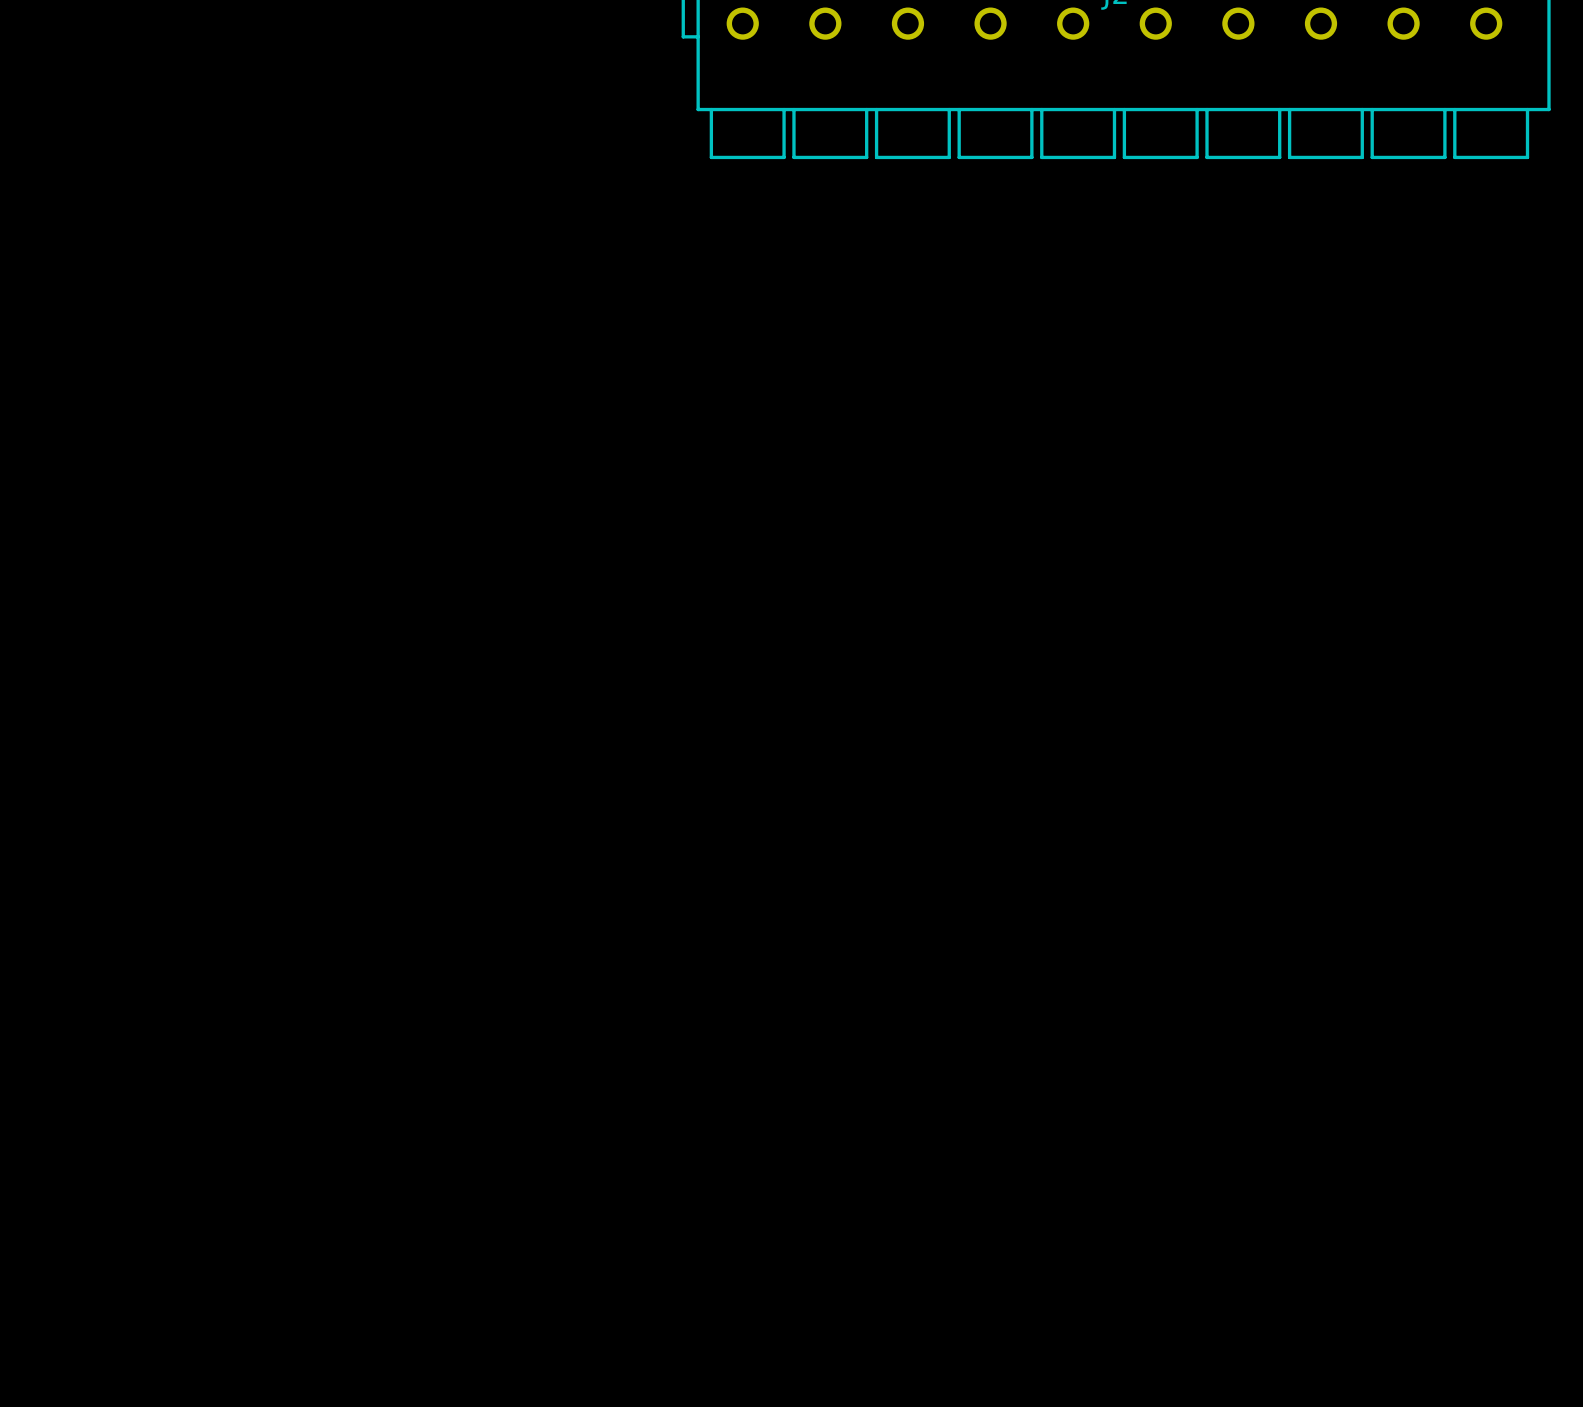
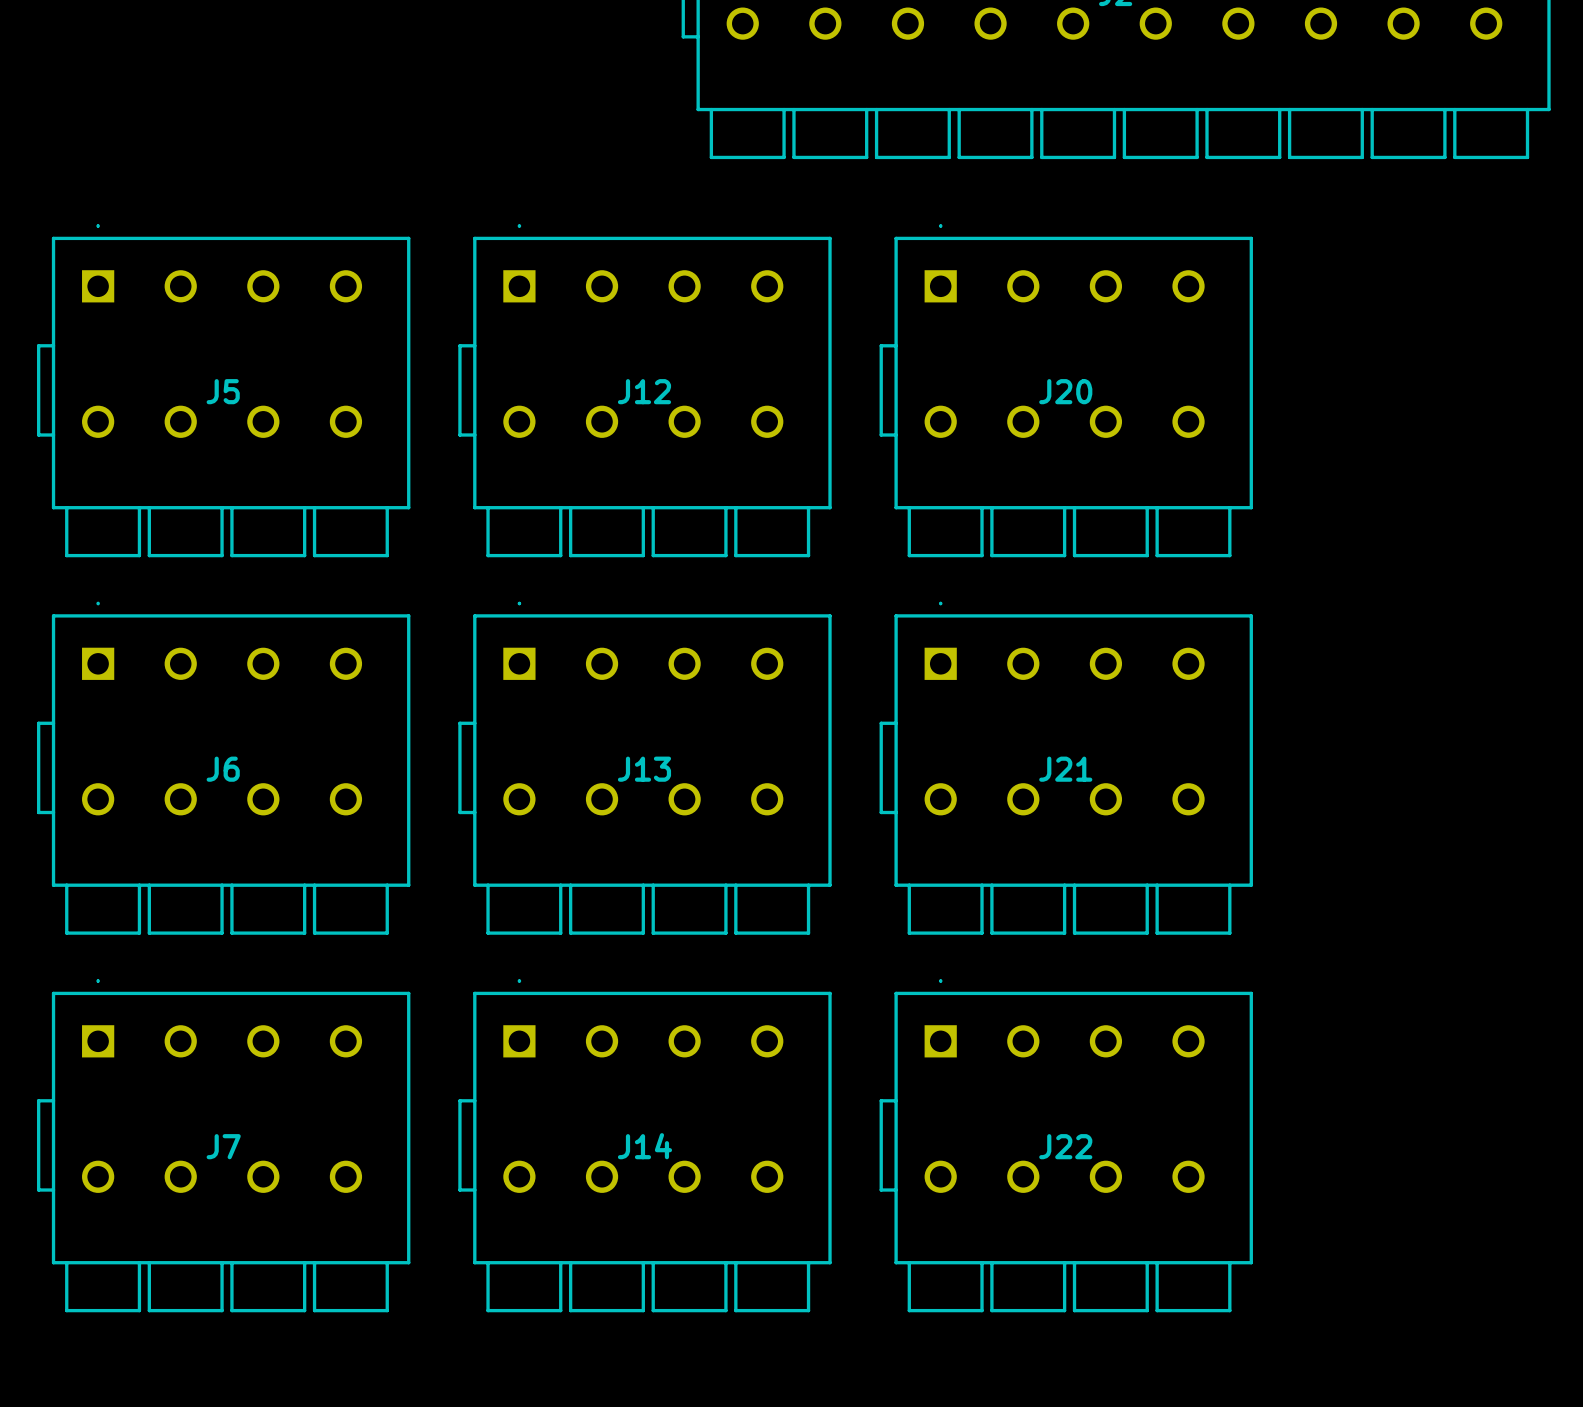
J5: none -> (223, 390)
J12: none -> (644, 390)
J20: none -> (1066, 390)
J6: none -> (223, 768)
J13: none -> (644, 768)
J21: none -> (1066, 768)
J7: none -> (223, 1145)
J14: none -> (644, 1145)
J22: none -> (1066, 1145)

